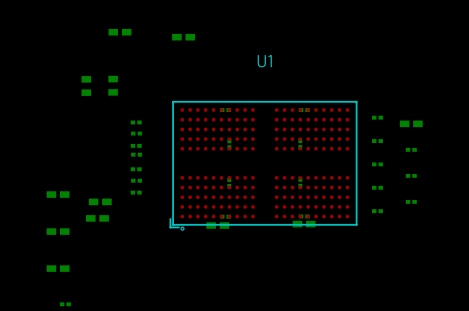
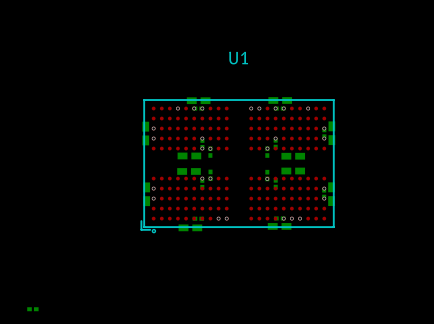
part: (119, 32) -> none
part: (183, 37) -> none
part: (113, 85) -> none
part: (86, 86) -> none
part: none -> (198, 100)
part: none -> (280, 100)
via: none -> (177, 108)
via: none -> (194, 108)
via: none -> (202, 108)
via: none -> (251, 108)
via: none -> (259, 108)
via: none -> (275, 108)
via: none -> (283, 108)
via: none -> (308, 108)
part: (377, 117) -> none
part: (136, 122) -> none
part: (411, 123) -> none
via: none -> (153, 128)
via: none -> (324, 128)
part: (136, 133) -> none
part: none -> (331, 133)
part: none -> (145, 133)
part: none -> (324, 133)
via: none -> (153, 138)
via: none -> (202, 138)
via: none -> (275, 138)
via: none -> (324, 138)
part: (377, 141) -> none
part: (136, 145) -> none
via: none -> (202, 148)
via: none -> (210, 148)
via: none -> (267, 148)
part: (411, 149) -> none
part: none -> (210, 152)
part: none -> (267, 152)
part: (136, 154) -> none
part: none -> (189, 155)
part: none -> (293, 156)
part: (377, 164) -> none
part: (136, 169) -> none
part: none -> (189, 171)
part: none -> (293, 171)
part: none -> (210, 175)
part: none -> (267, 175)
part: (411, 175) -> none
via: none -> (202, 178)
via: none -> (210, 178)
via: none -> (267, 178)
part: (136, 180) -> none
via: none -> (153, 188)
via: none -> (324, 188)
part: (377, 187) -> none
part: (136, 192) -> none
part: none -> (324, 193)
part: none -> (331, 194)
part: none -> (146, 194)
part: (58, 194) -> none
via: none -> (153, 198)
via: none -> (324, 198)
part: (100, 201) -> none
part: (411, 201) -> none
part: (377, 211) -> none
via: none -> (218, 218)
via: none -> (226, 218)
via: none -> (283, 218)
via: none -> (291, 218)
via: none -> (300, 218)
part: (97, 218) -> none
part: (58, 231) -> none
part: (58, 268) -> none

